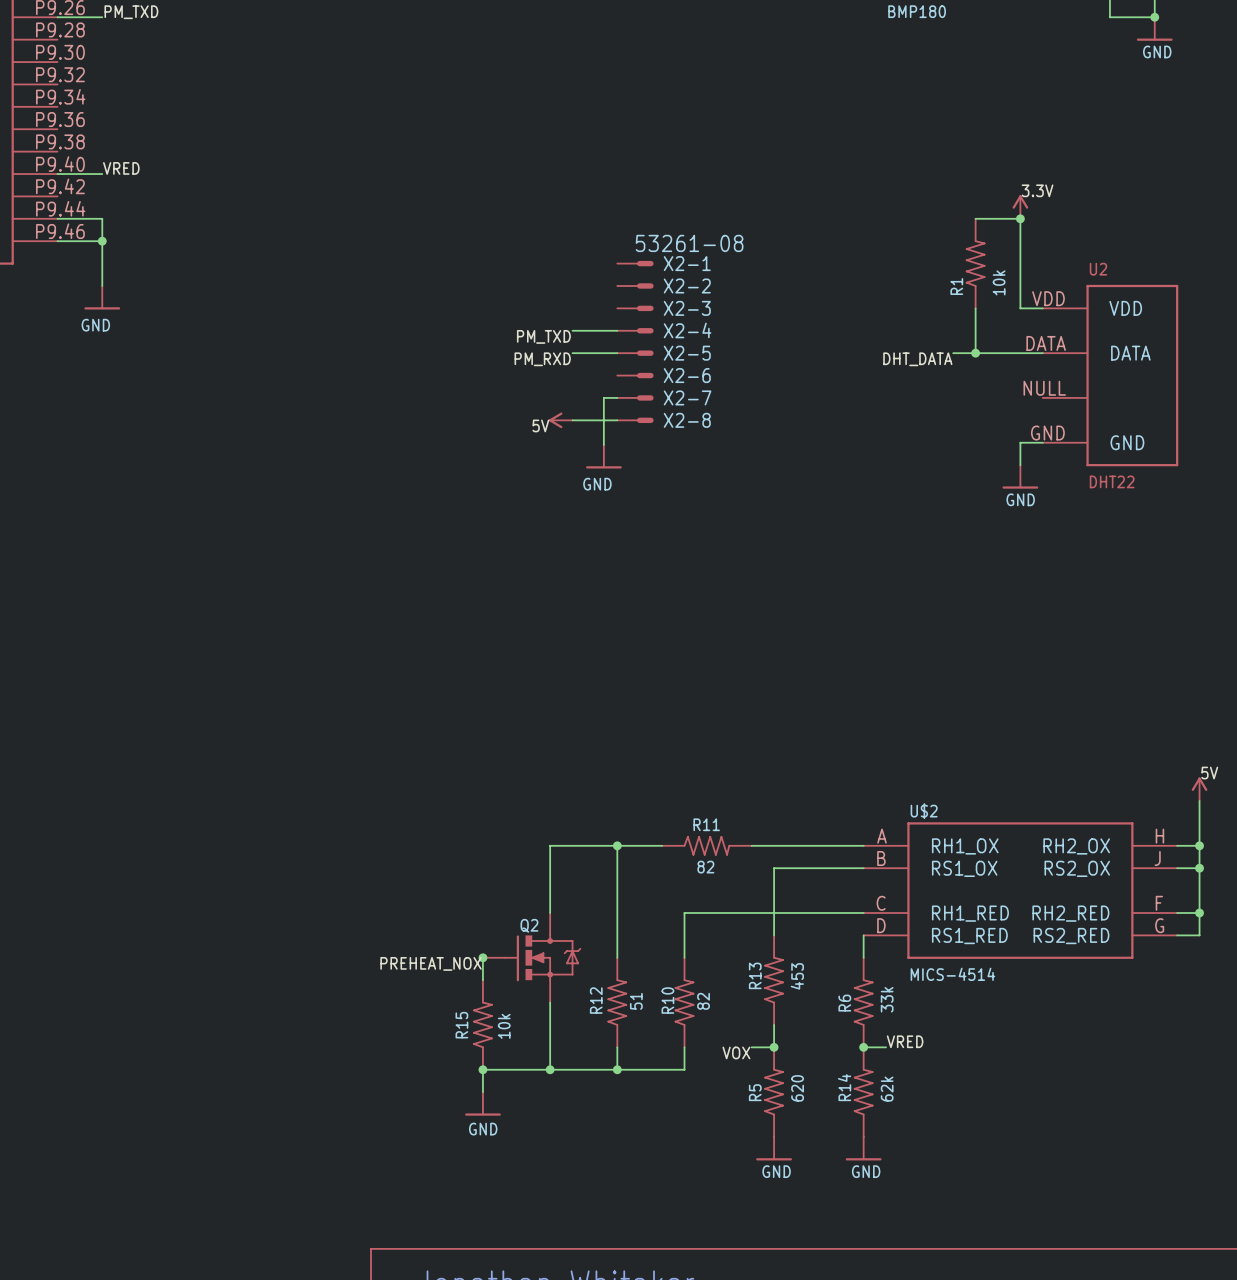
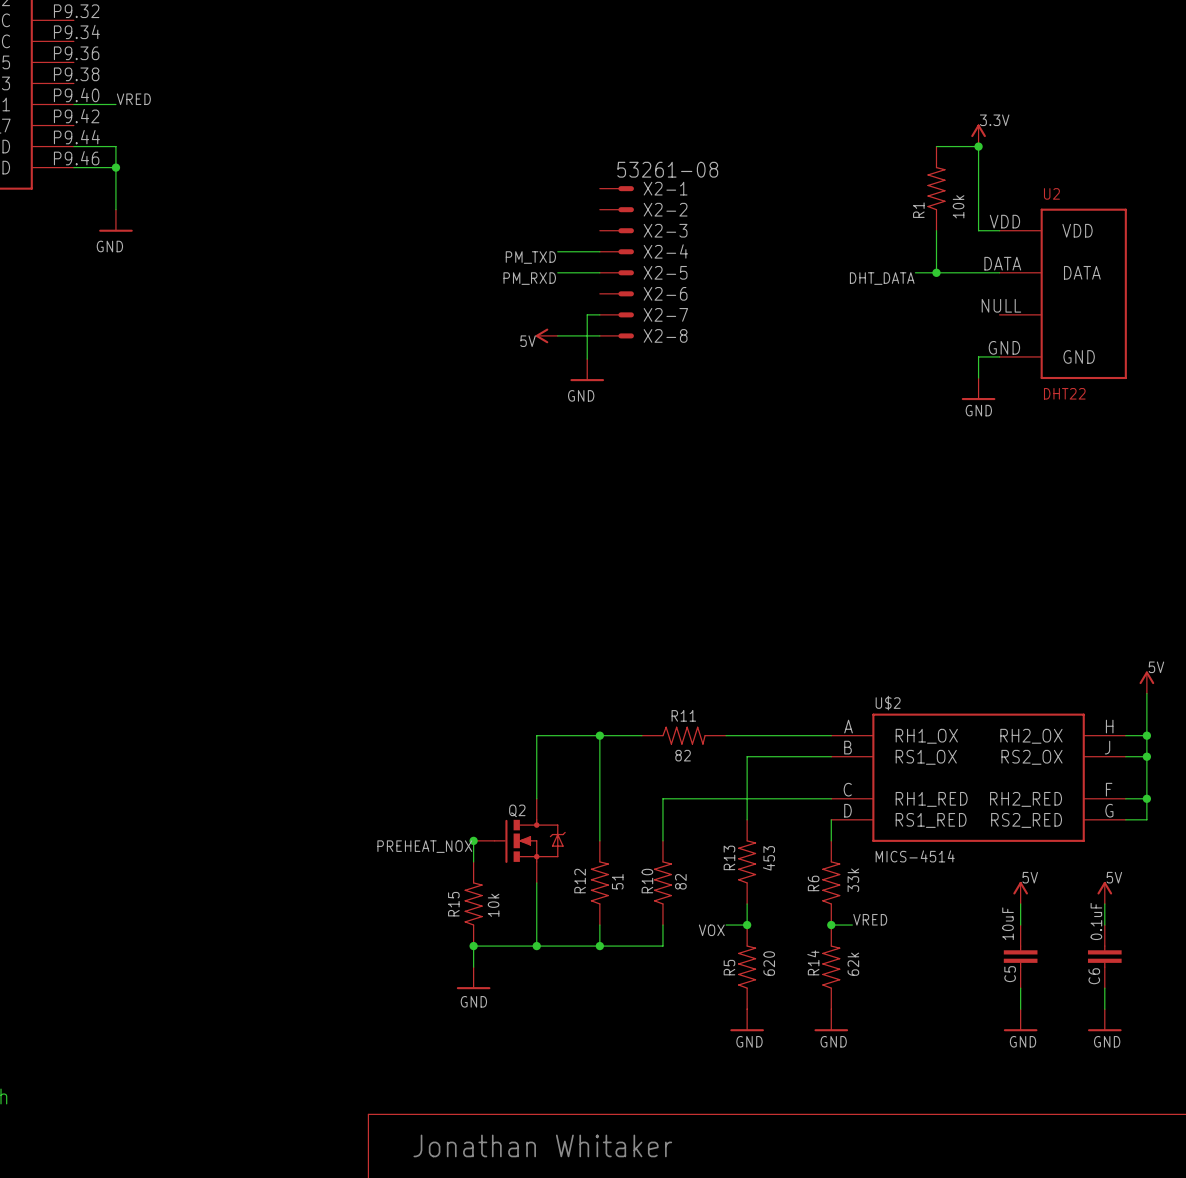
label: none -> 5V (1030, 877)
label: none -> 5V (1114, 877)
power symbol: none -> (1020, 892)
power symbol: none -> (1104, 892)
wire: none -> (1020, 903) (1020, 925)
wire: none -> (1104, 903) (1104, 925)
C5: none -> 10uF (1020, 956)
C6: none -> 0.1uF (1104, 956)
wire: none -> (1020, 988) (1020, 1009)
wire: none -> (1104, 988) (1104, 1009)
power symbol: none -> GND (1020, 1020)
power symbol: none -> GND (1104, 1020)

